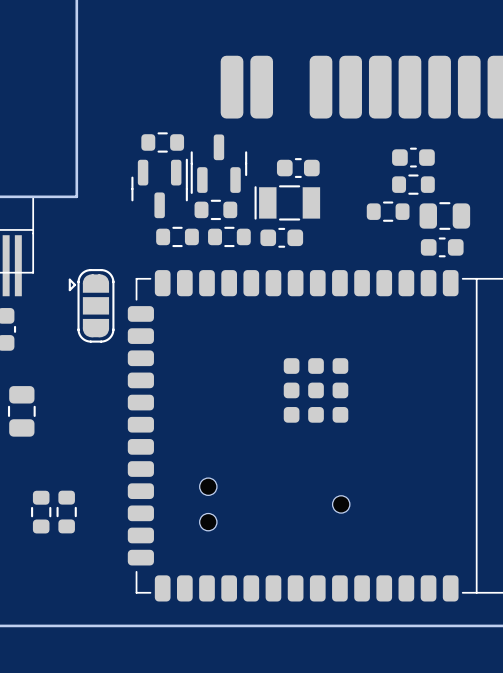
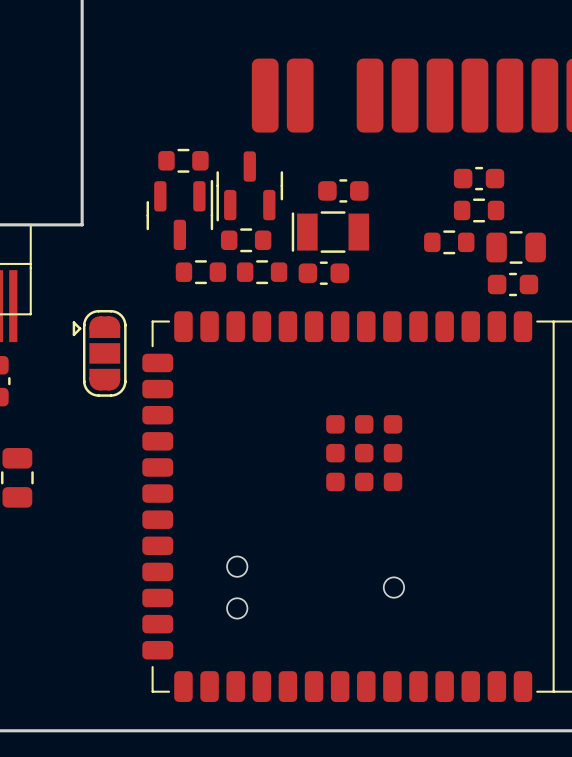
part: (41, 512) -> none
part: (66, 512) -> none

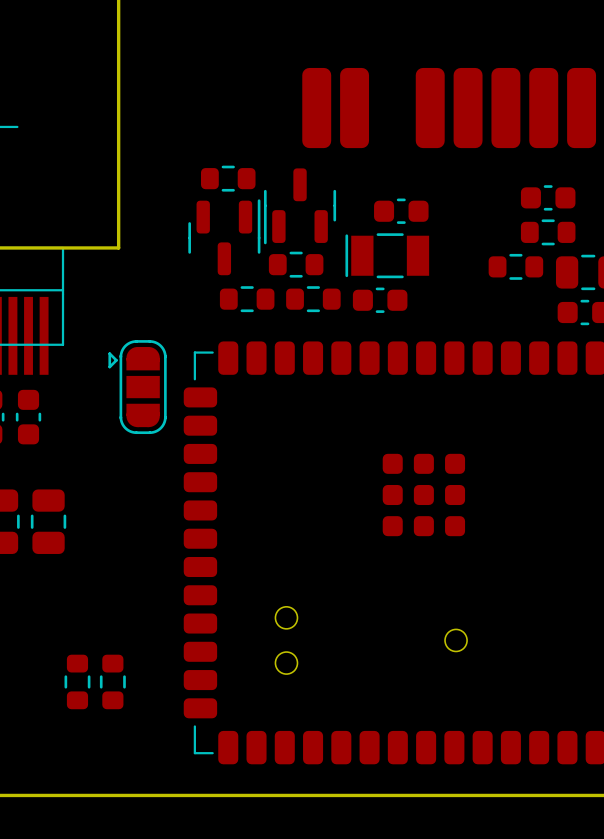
part: none -> (77, 681)
part: none -> (112, 681)

